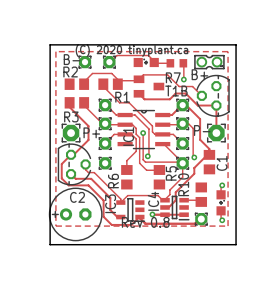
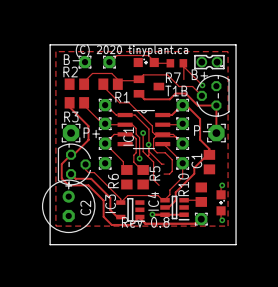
track: none -> (183, 62) (184, 67) (202, 85)
via position: (183, 79) -> (202, 85)
track: (182, 123) (188, 123) (193, 128) (194, 157) -> none
track: none -> (105, 143) (123, 161) (123, 169)
track: none -> (182, 143) (175, 136) (155, 136) (153, 138) (153, 149) (157, 152) (165, 152) (172, 159) (172, 171) (169, 174) (164, 174)
track: none -> (148, 144) (148, 151) (161, 164) (164, 164)
via: none -> (148, 144)
track: (136, 151) (126, 160) (126, 169) -> (136, 151) (133, 162) (143, 169)
track: (143, 151) (143, 159) (145, 162) (181, 162) -> (143, 151) (153, 162) (153, 179) (159, 185)
via: (147, 156) -> none
via: (194, 157) -> none
track: (139, 158) (139, 163) (146, 170) (159, 169) -> none
via: none -> (139, 158)
C1 name position: C1 (222, 163) -> C1 (196, 160)
R5 position: (159, 177) -> (143, 177)
C2 rotation: 0° (75, 214) -> 90° clockwise (68, 206)

